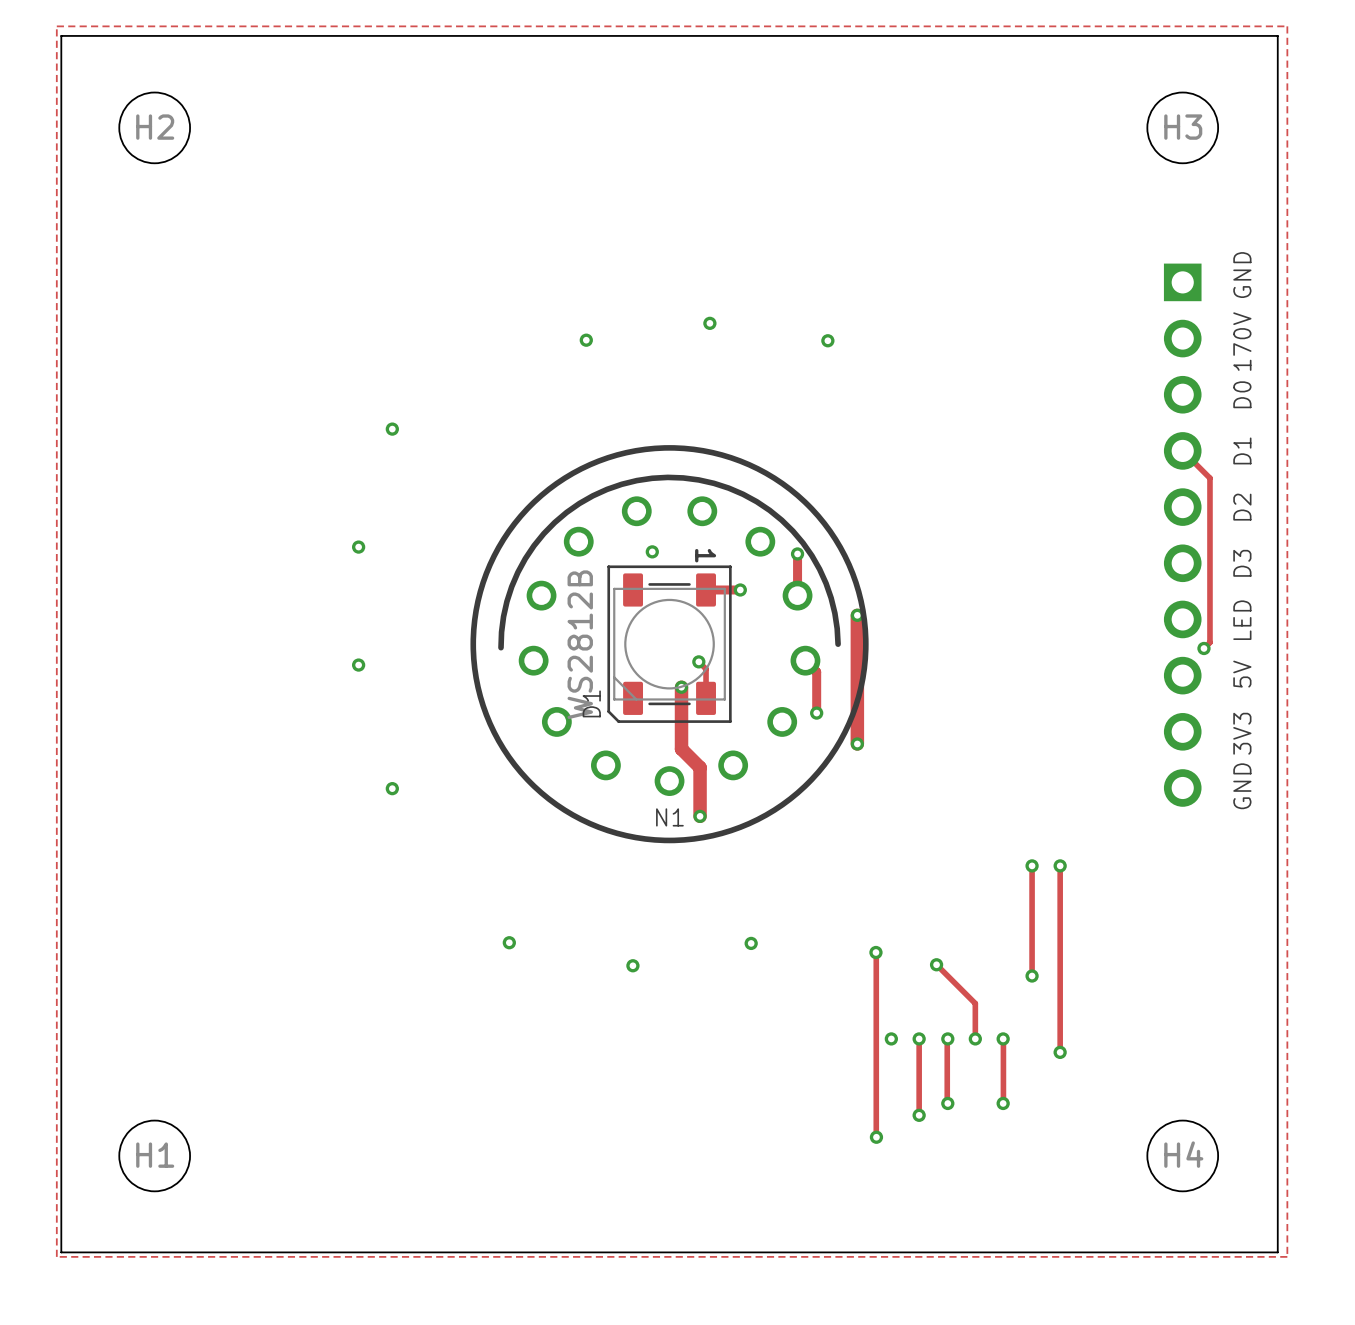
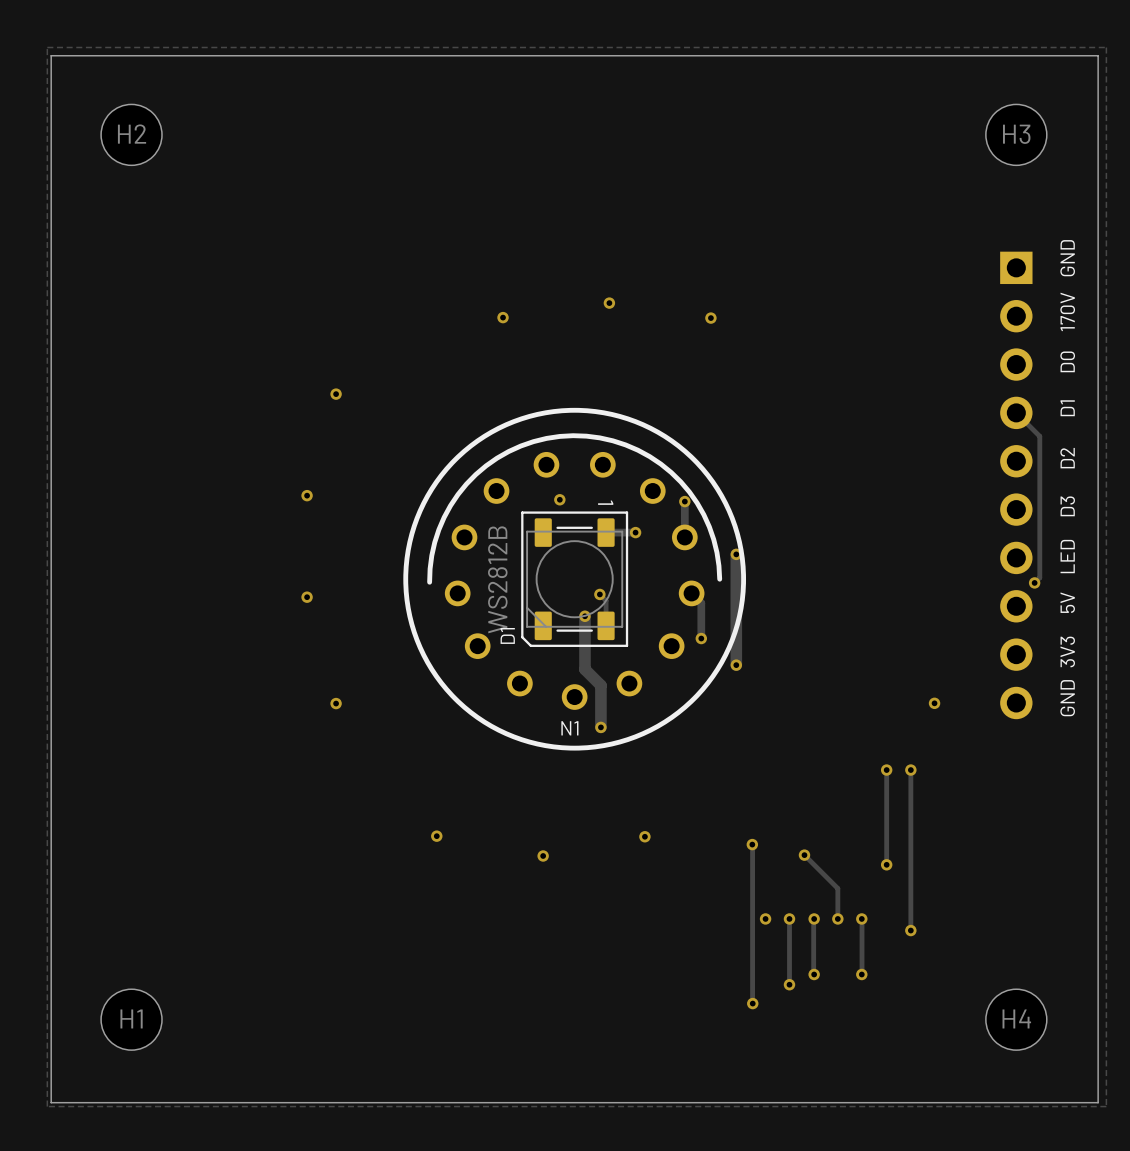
via: none -> (934, 703)

